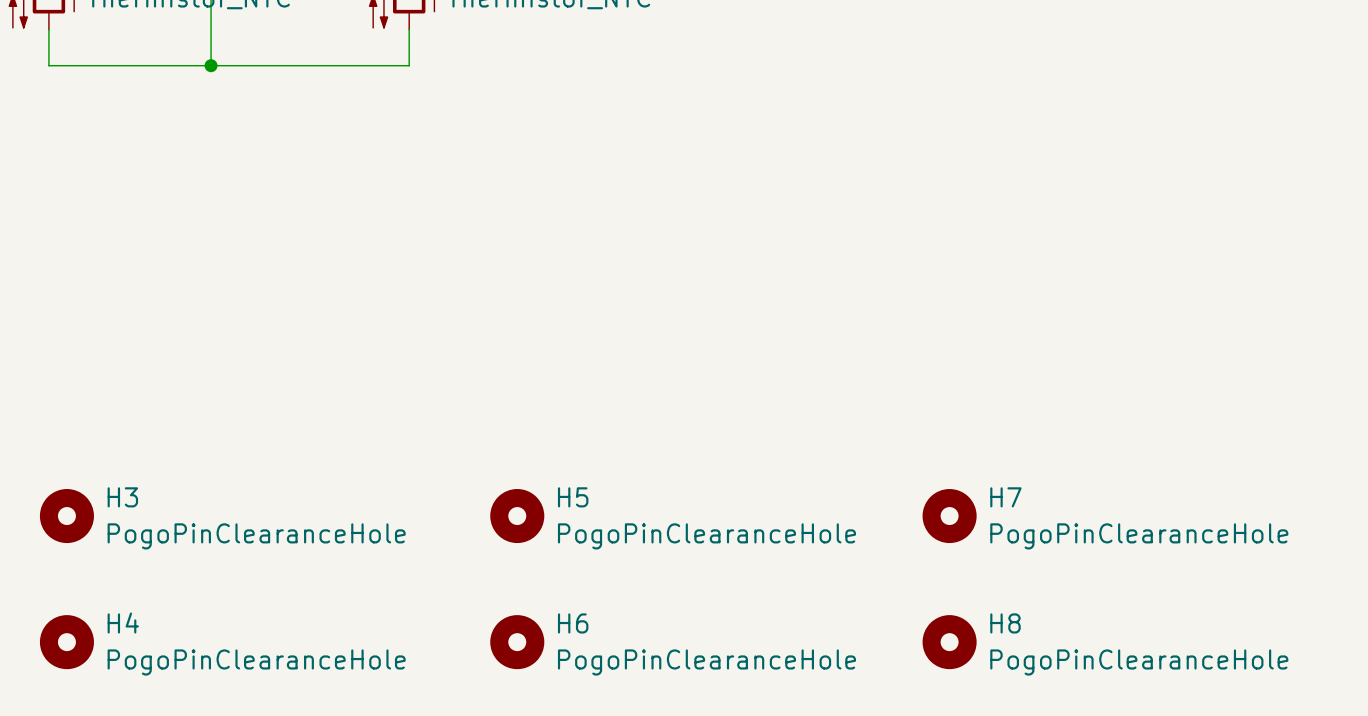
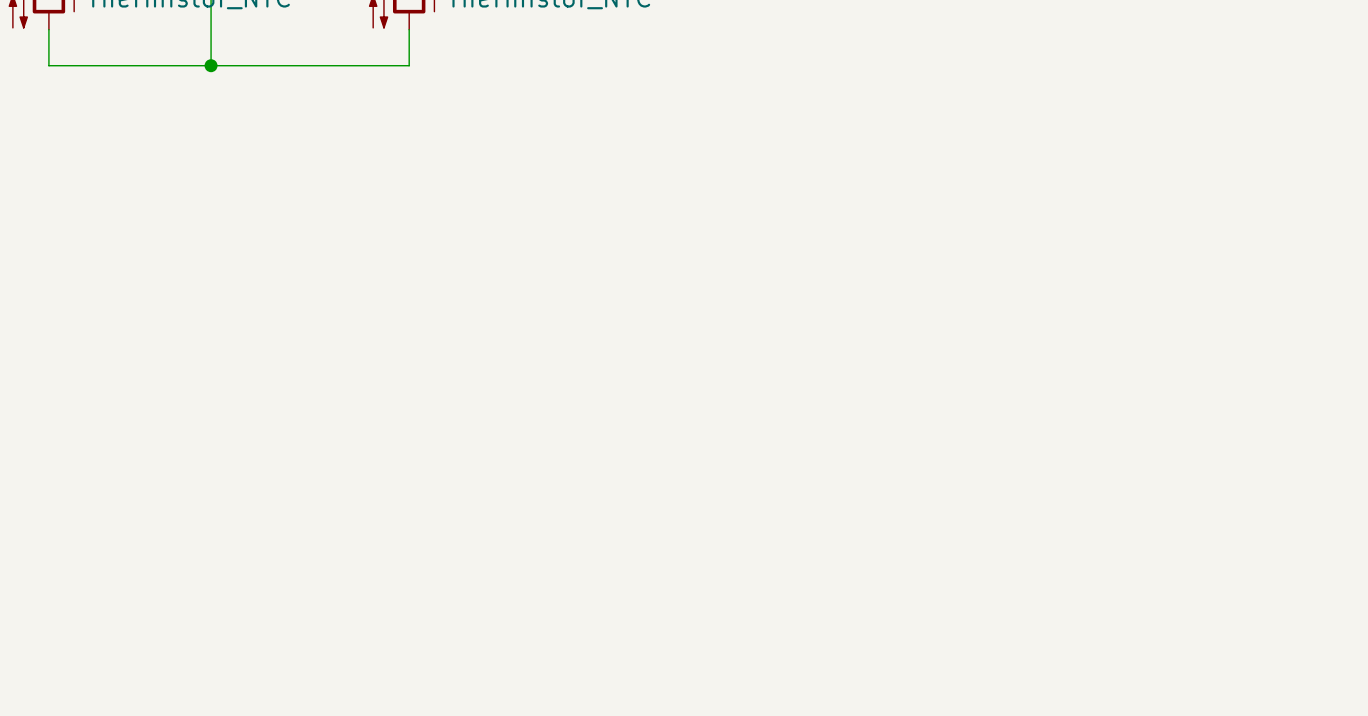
H3: PogoPinClearanceHole (66, 516) -> none
H5: PogoPinClearanceHole (517, 516) -> none
H7: PogoPinClearanceHole (949, 516) -> none
H4: PogoPinClearanceHole (66, 642) -> none
H6: PogoPinClearanceHole (517, 642) -> none
H8: PogoPinClearanceHole (949, 642) -> none

